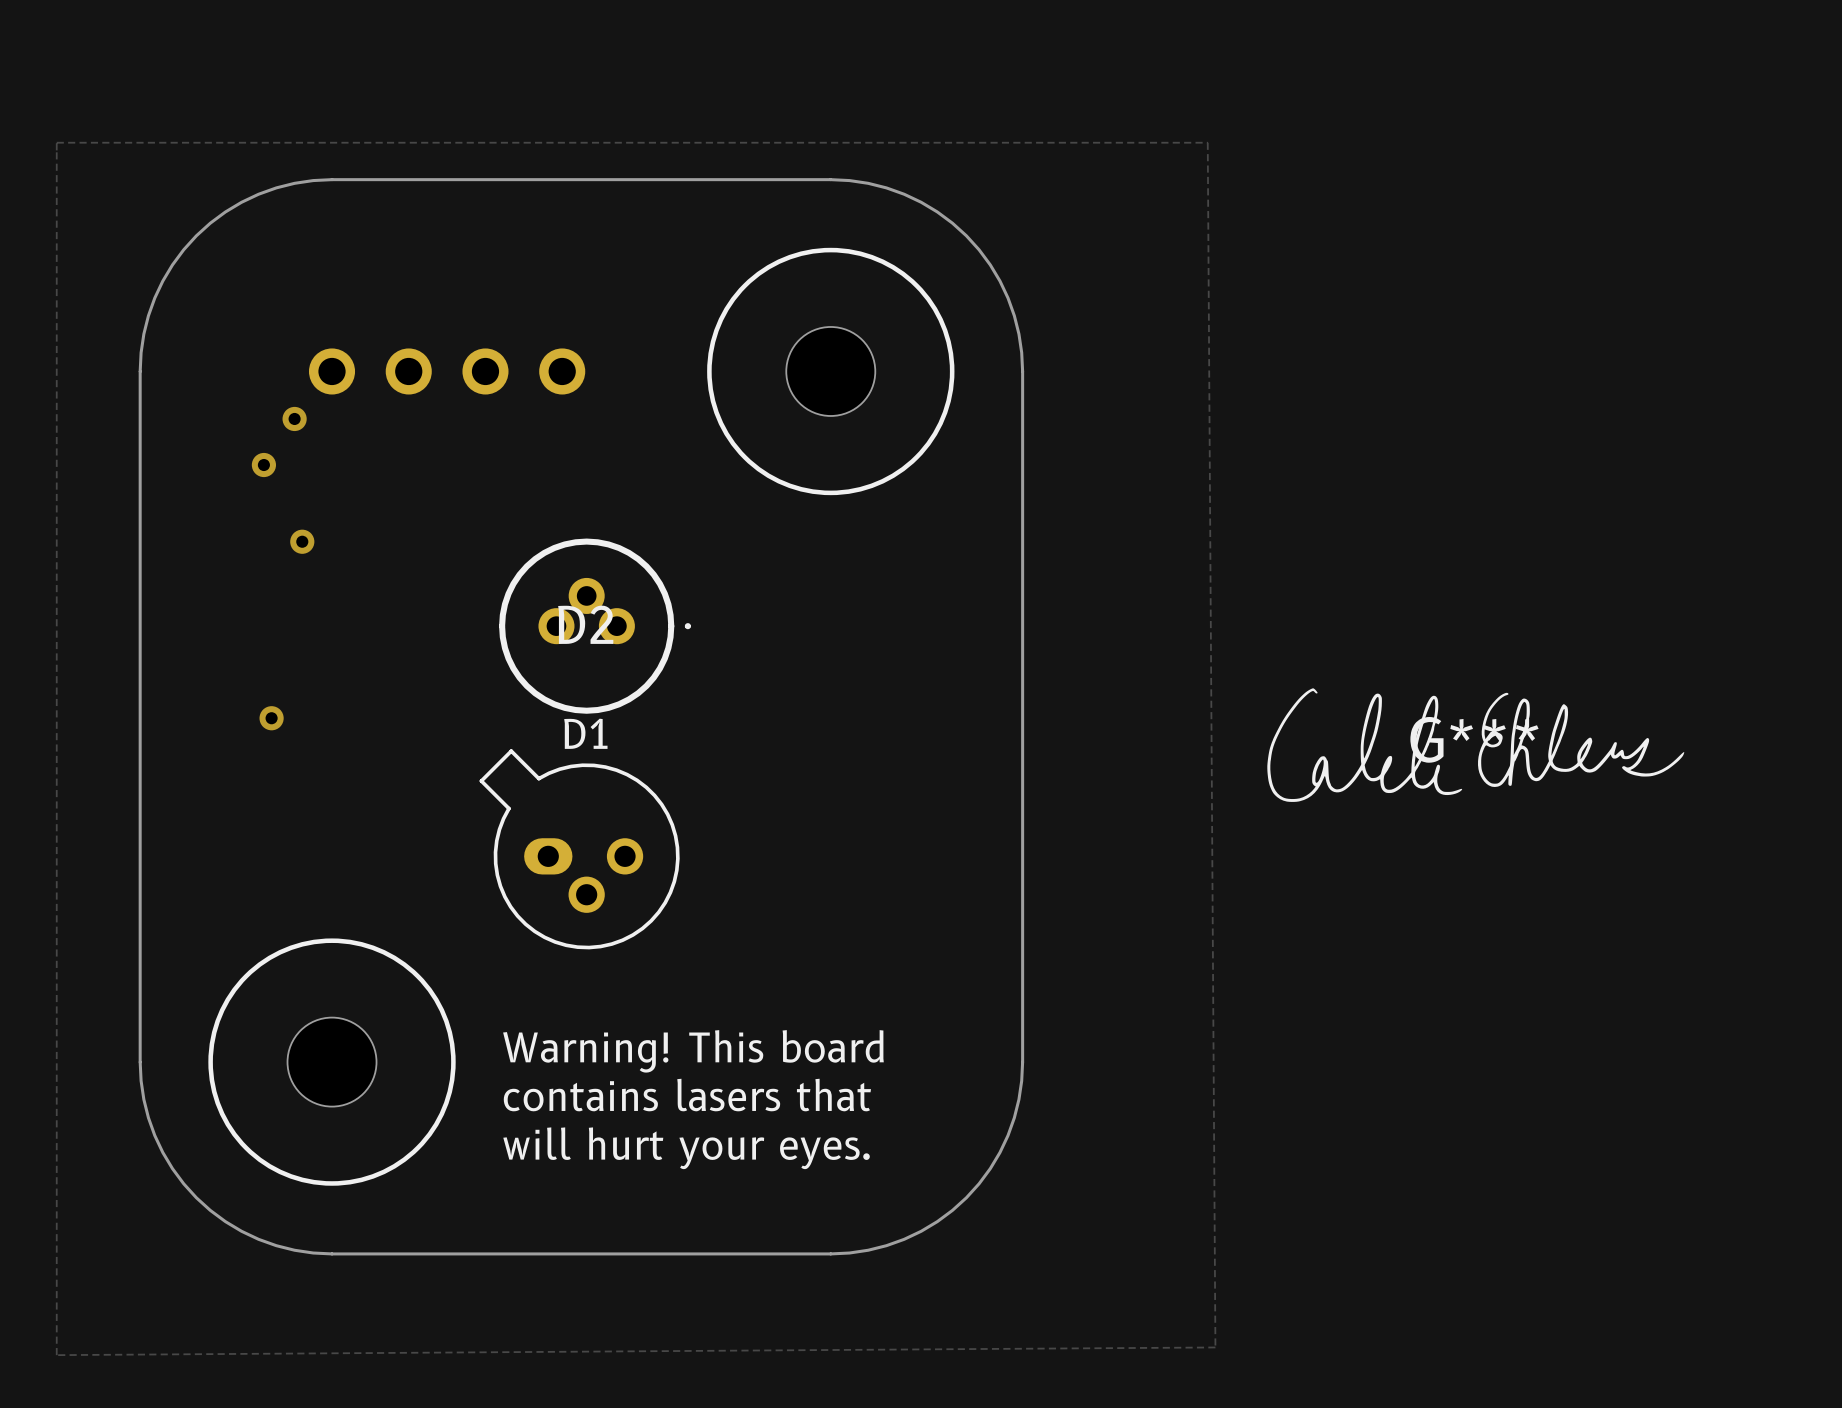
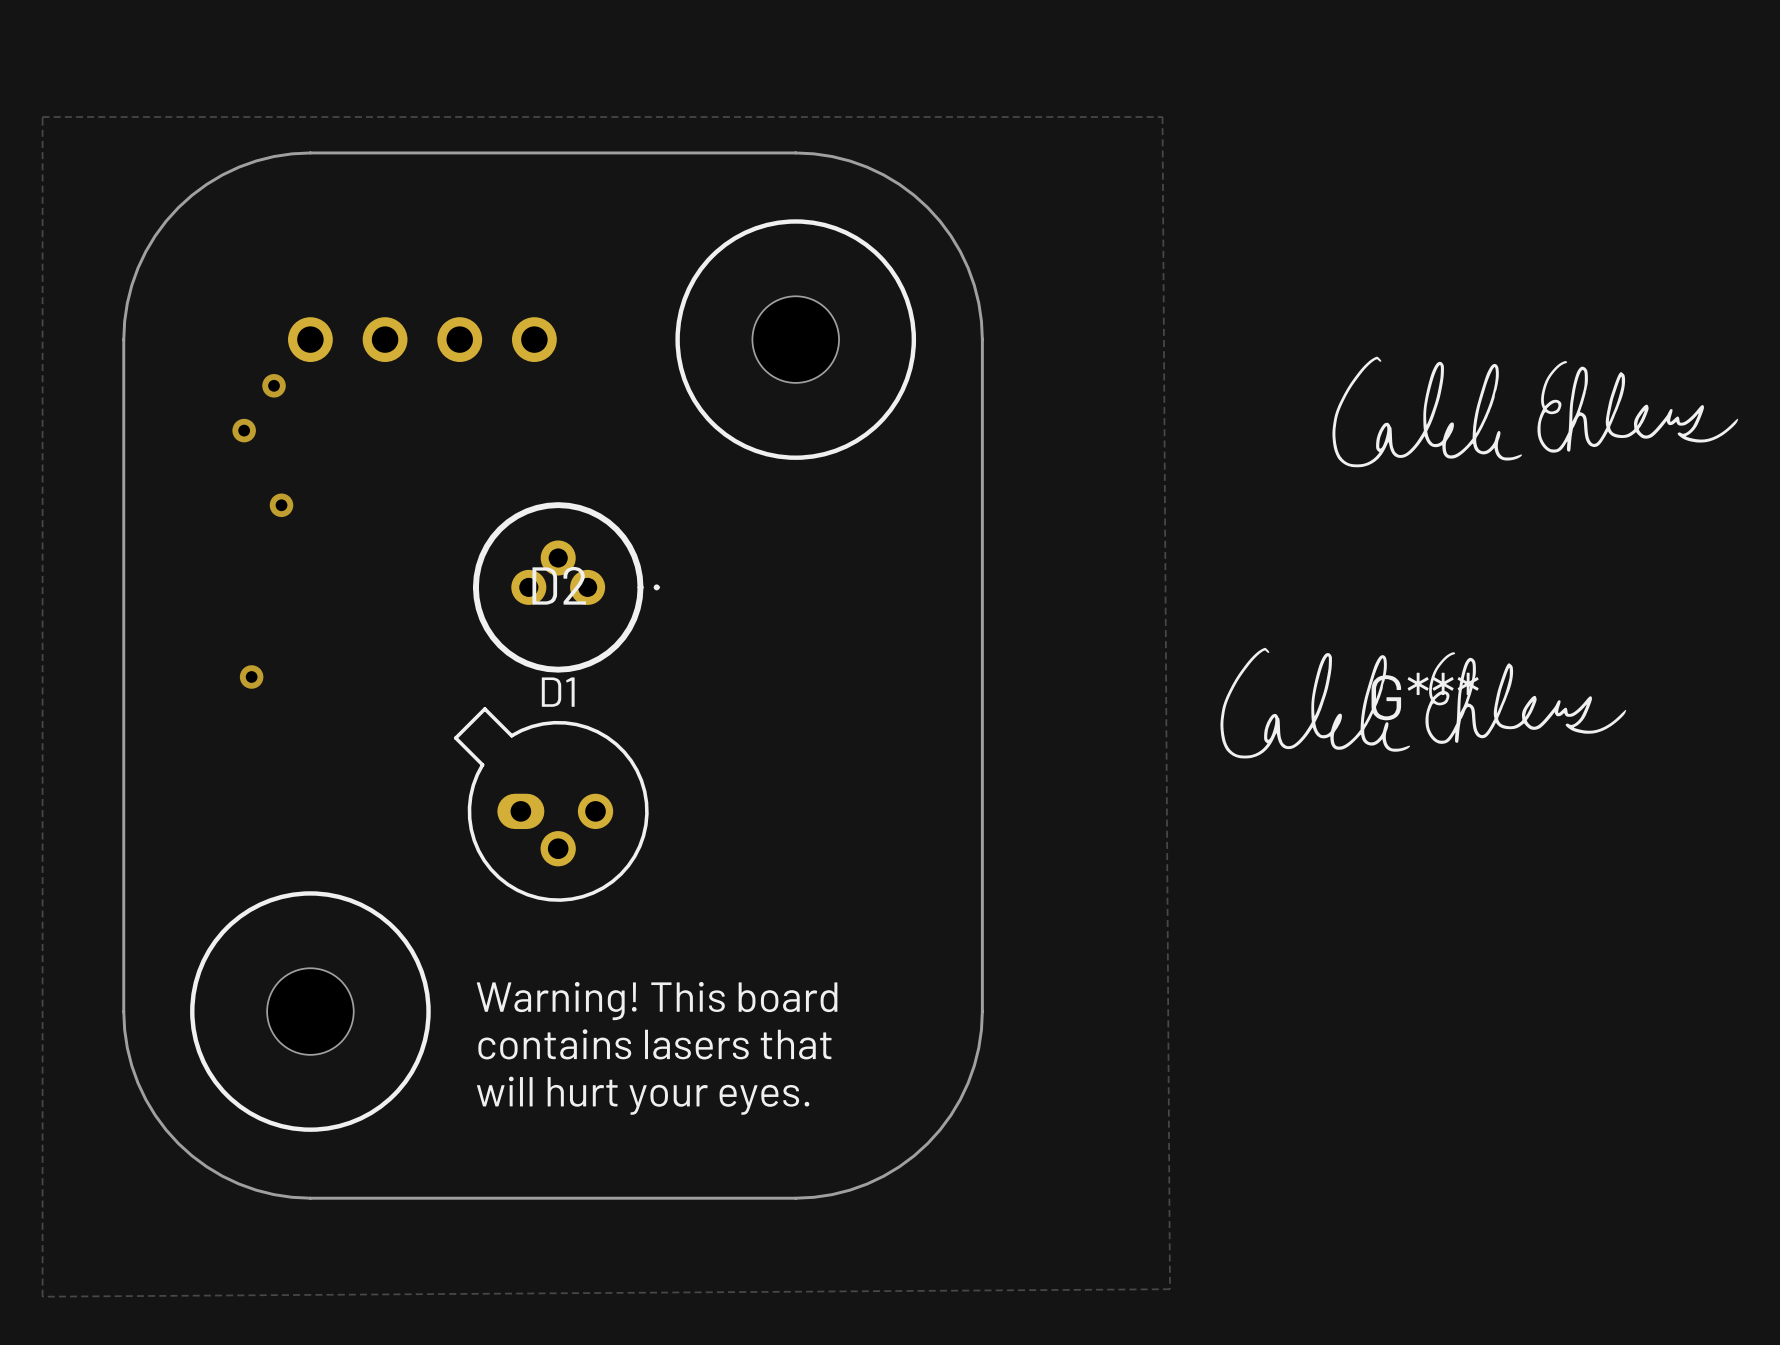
drawing: none -> [1332, 356, 1739, 468]

